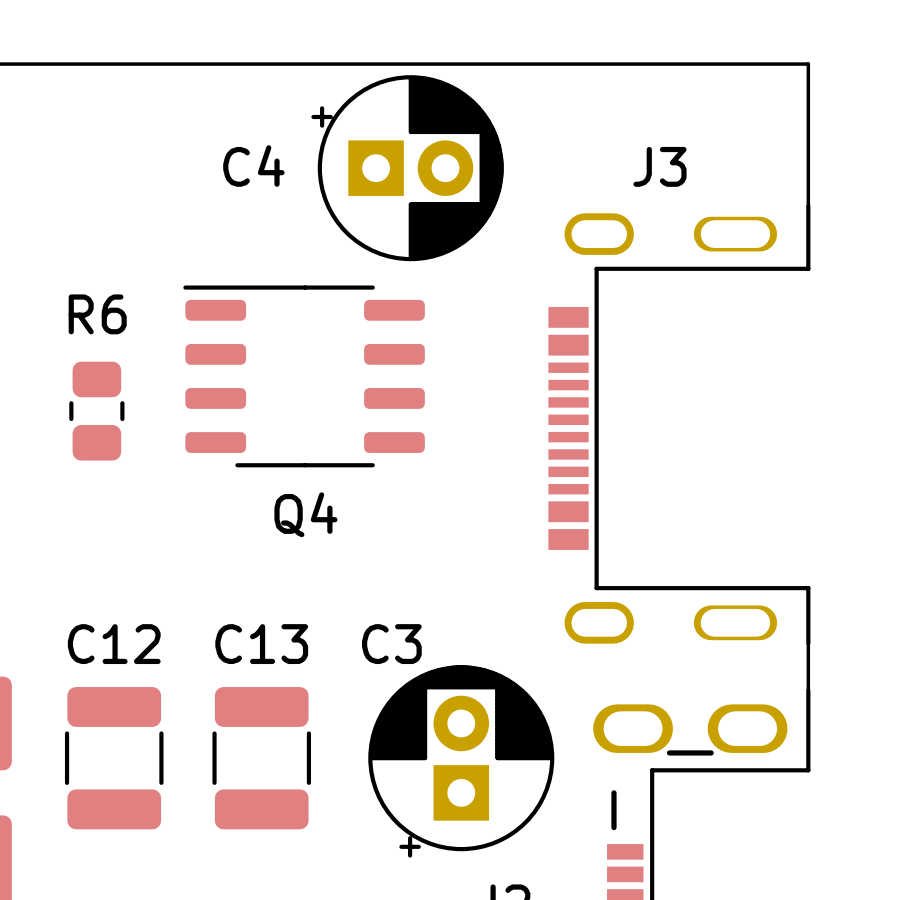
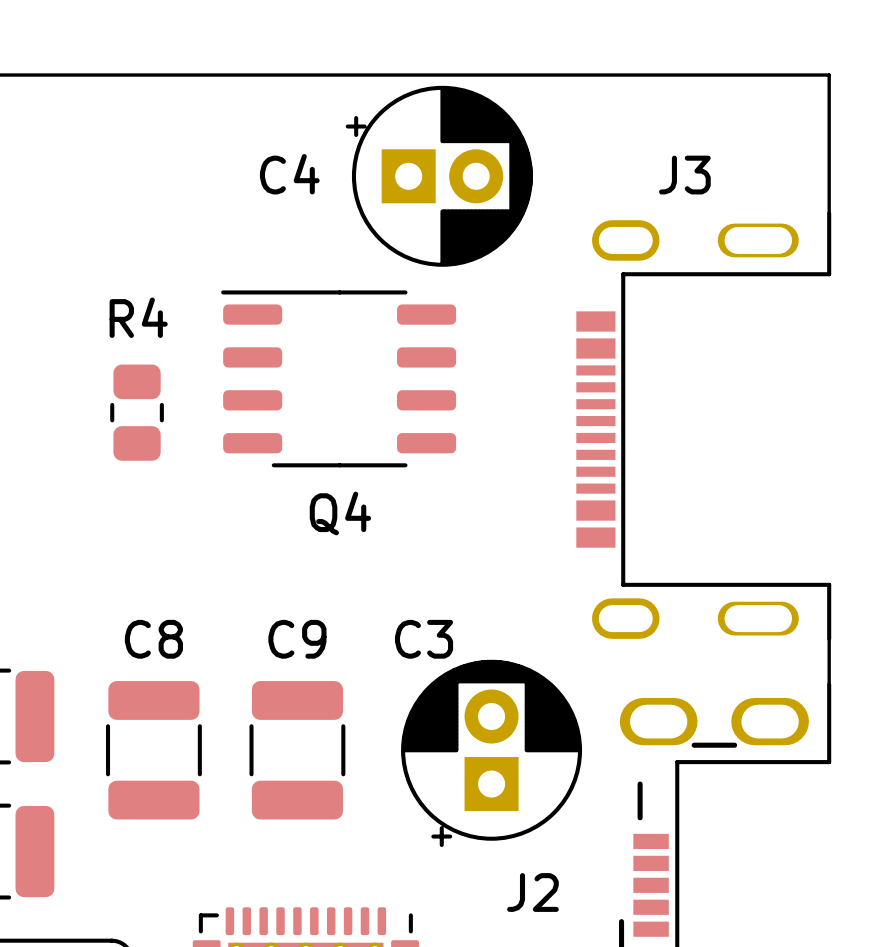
R6 name: R6 (97, 314) -> R4 (138, 317)
C12 name: C12 (114, 644) -> C8 (153, 639)
C13 name: C13 (261, 644) -> C9 (297, 639)

